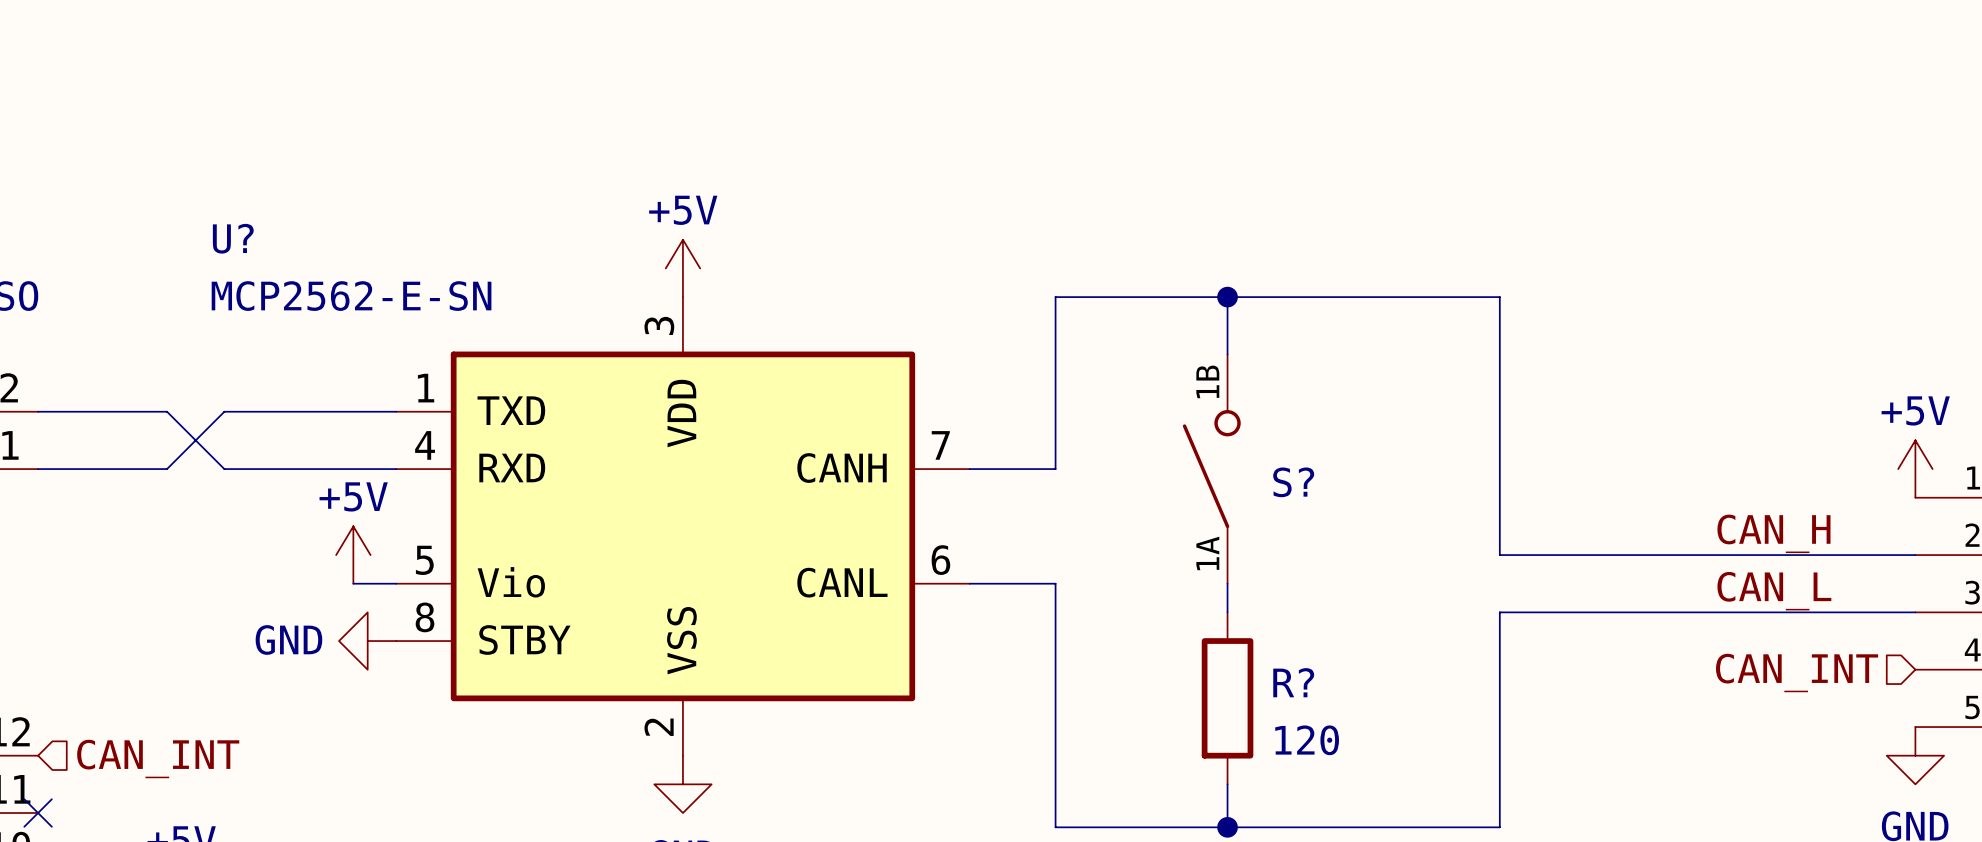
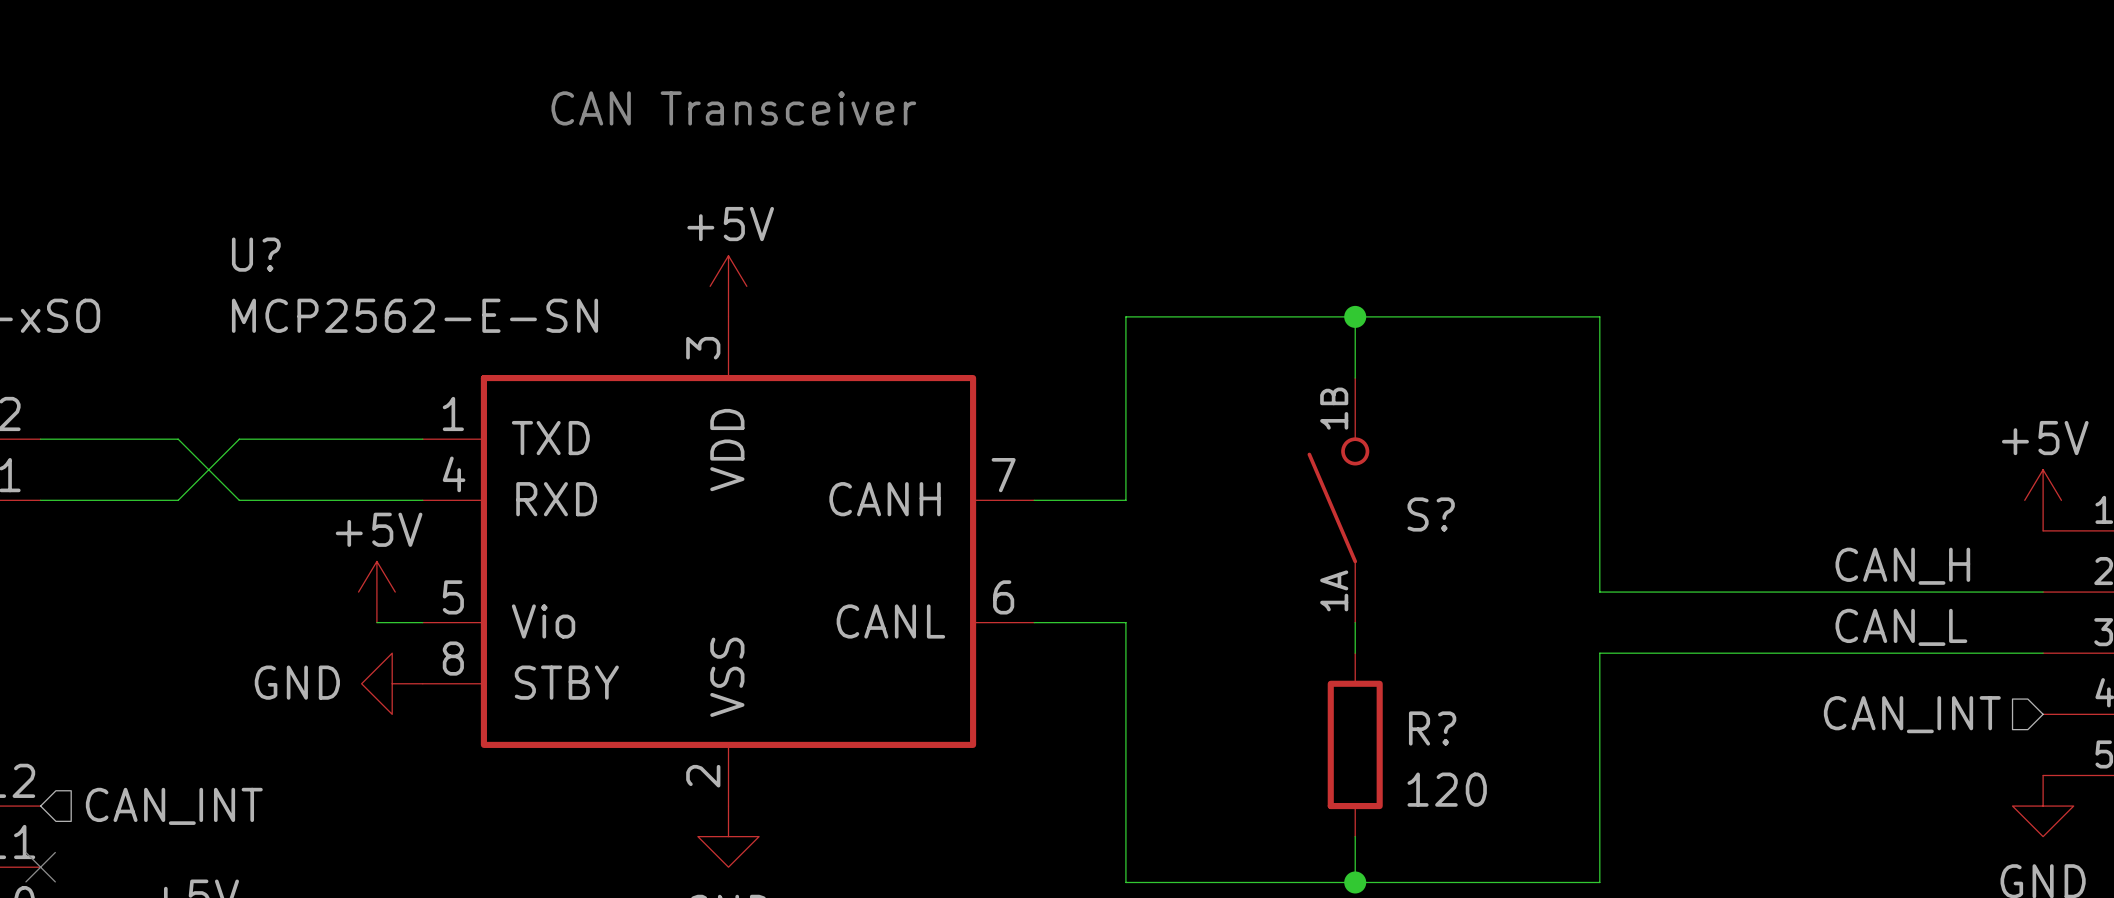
text: none -> CAN Transceiver (733, 108)
wire: (1227, 297) (1227, 354) -> (1355, 316) (1355, 378)
junction position: (1227, 297) -> (1355, 316)
S? position: (1211, 469) -> (1338, 500)
wire: (1227, 583) (1227, 612) -> (1355, 622) (1355, 653)
R? position: (1227, 698) -> (1355, 744)
wire: (1227, 784) (1227, 827) -> (1355, 836) (1355, 882)
junction position: (1227, 827) -> (1355, 882)

